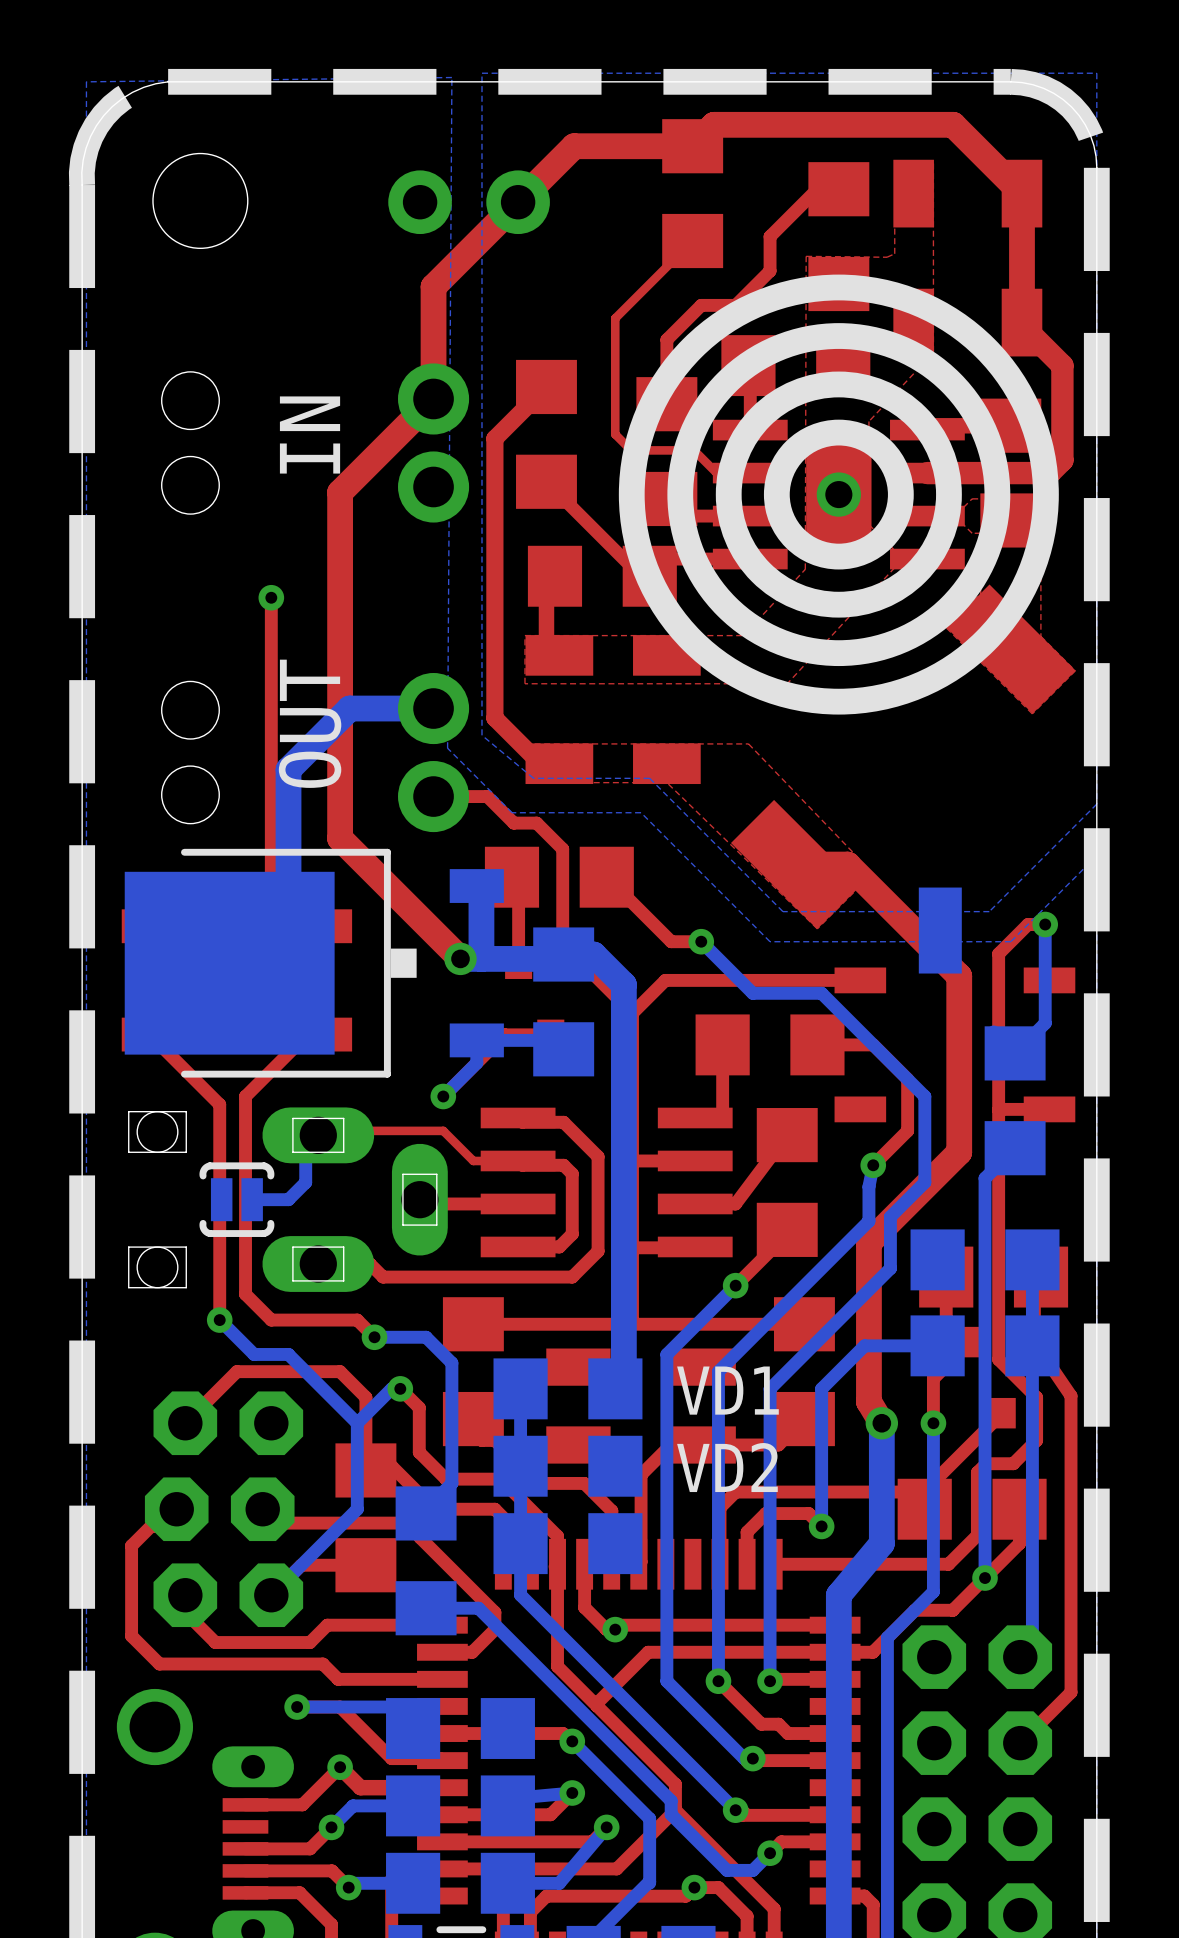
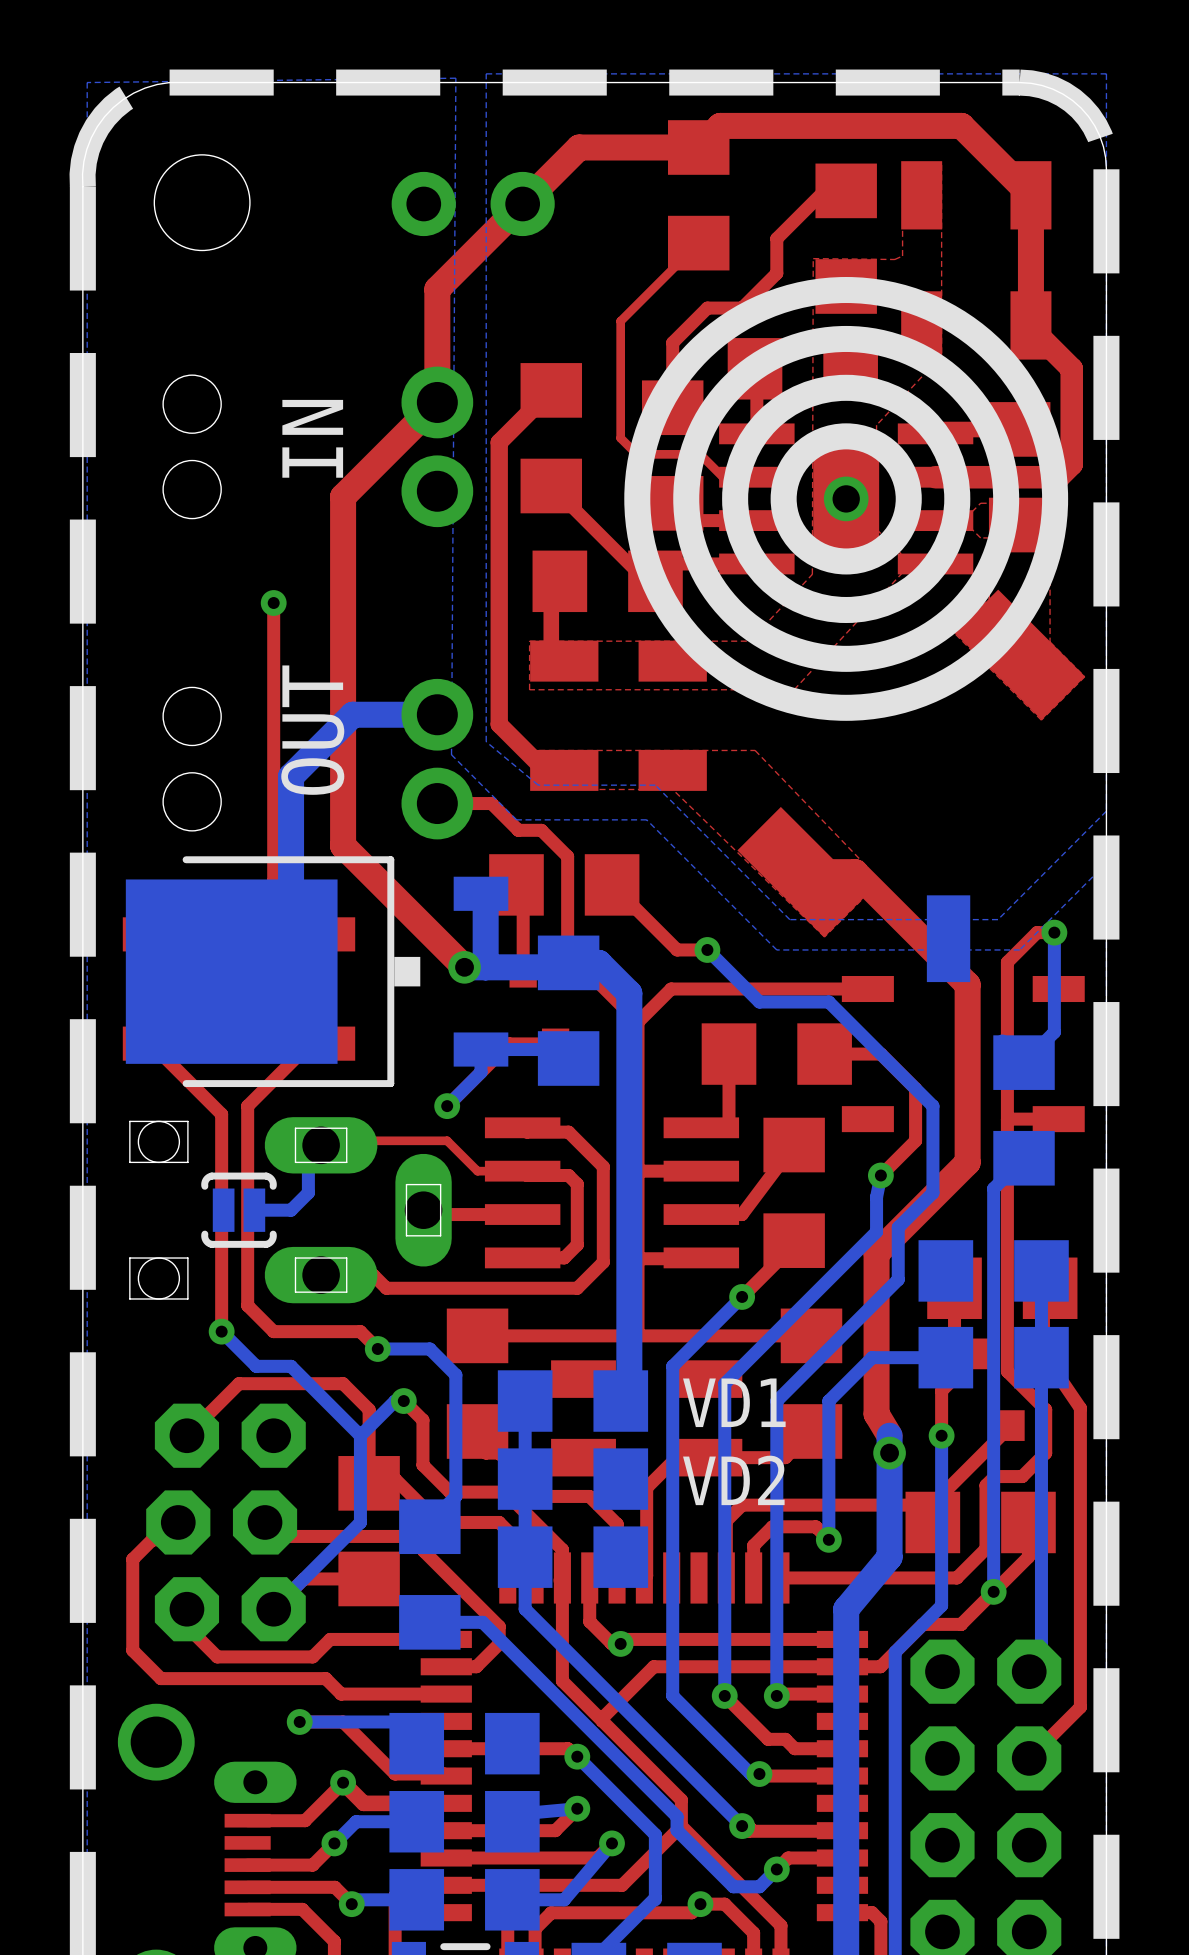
via position: (881, 1423) -> (889, 1453)

